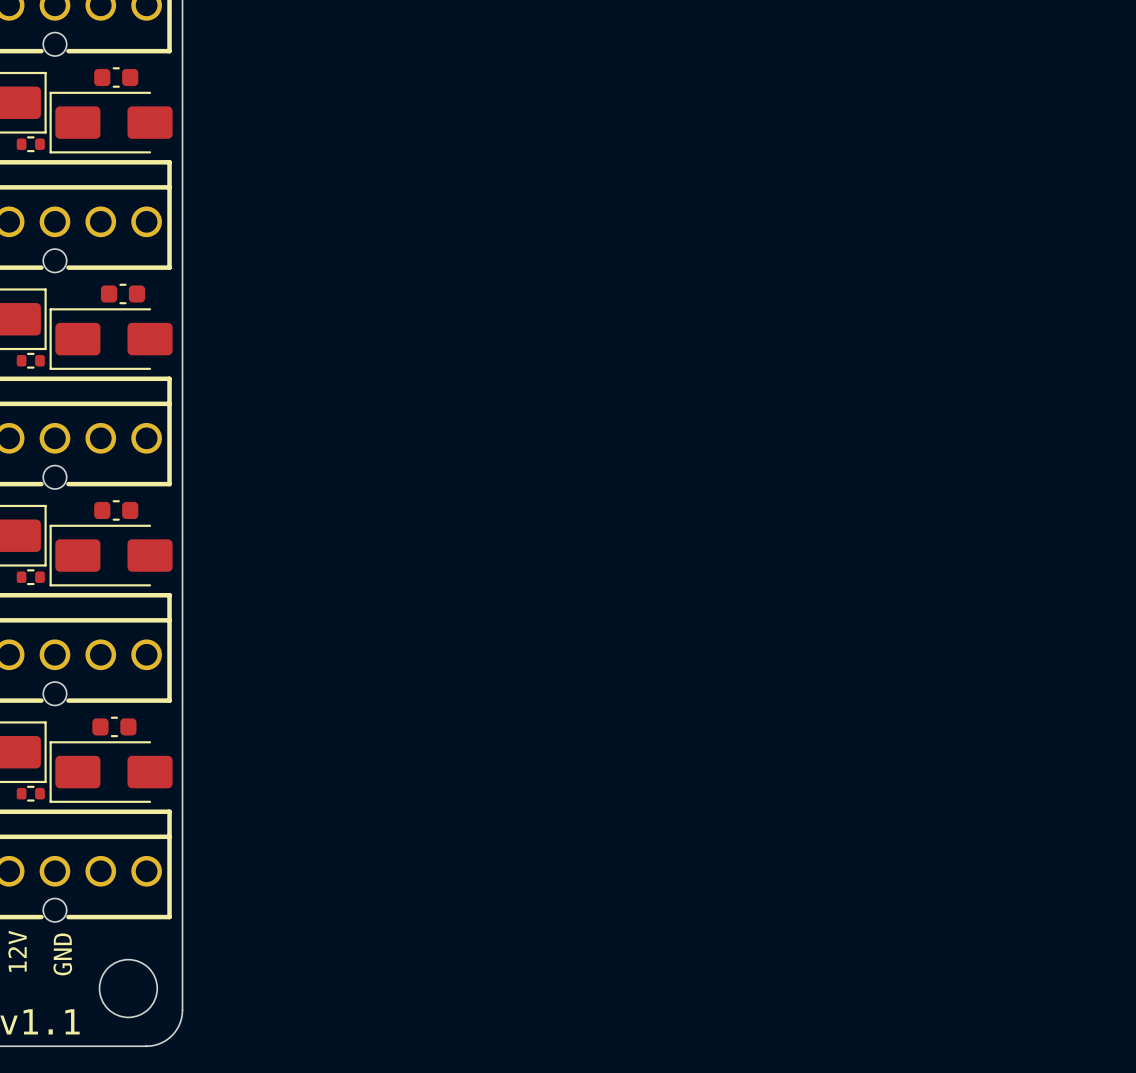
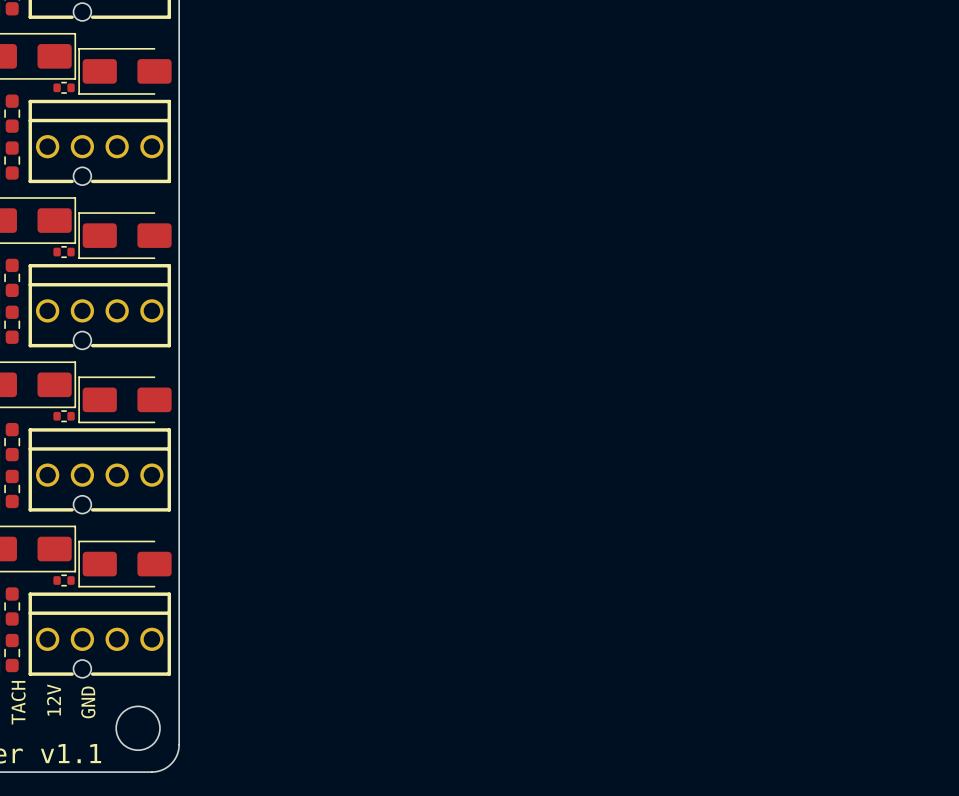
part: (116, 77) -> none
part: (122, 293) -> none
part: (116, 510) -> none
part: (114, 726) -> none

